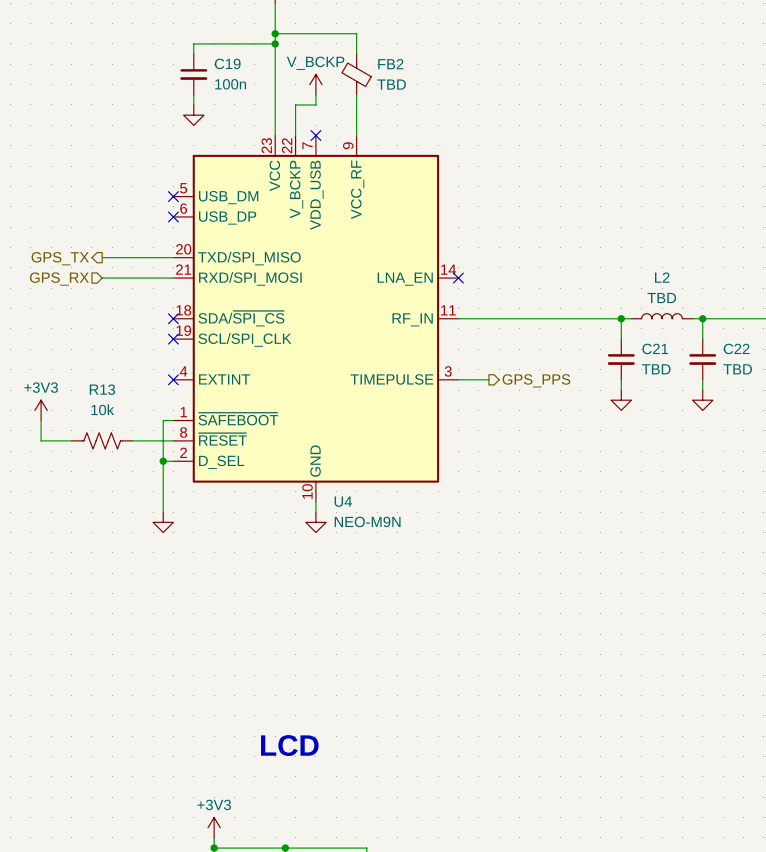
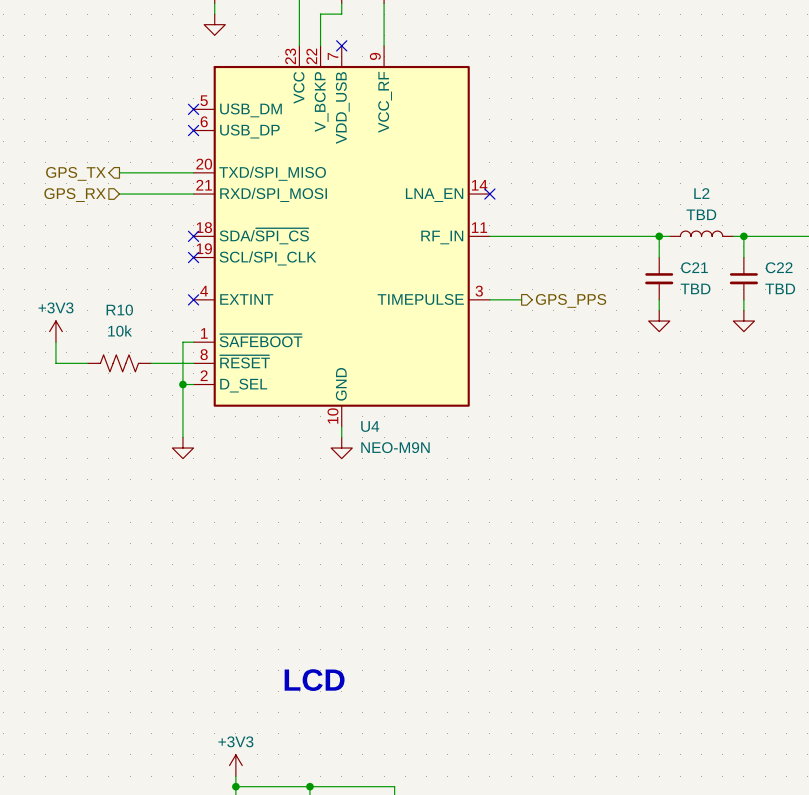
R13 name: R13 (102, 389) -> R10 (119, 310)

